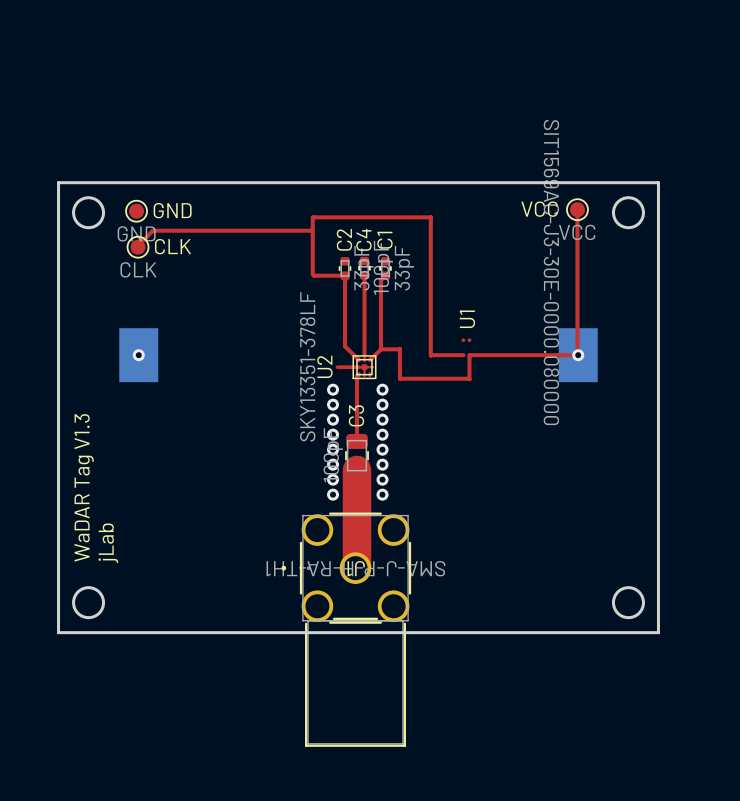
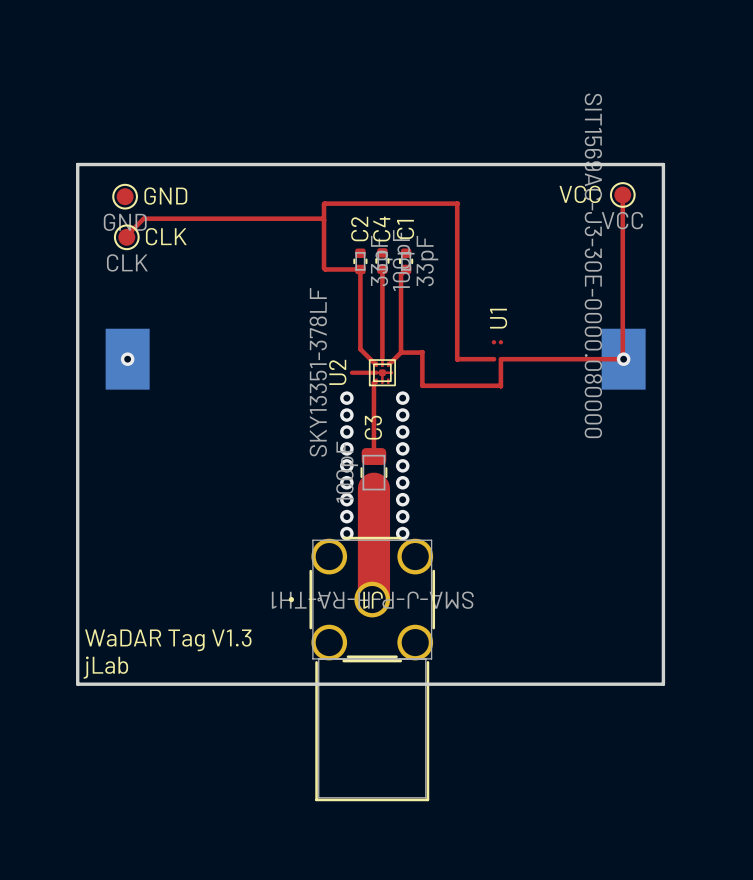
board edge: (94, 182) (58, 182) (58, 632) (658, 632) (658, 182) (613, 182) -> (77, 164) (77, 684) (663, 684) (663, 164)
round board edge: [72, 196, 106, 230] -> none
round board edge: [611, 196, 645, 230] -> none
text rotation: 0° (84, 487) -> 90° clockwise (168, 640)
via: none -> (346, 533)
via: none -> (402, 533)
text rotation: 0° (108, 543) -> 90° clockwise (105, 667)
text position: jLab (108, 543) -> jLab (105, 667)
round board edge: [72, 586, 106, 620] -> none
round board edge: [611, 586, 645, 620] -> none

